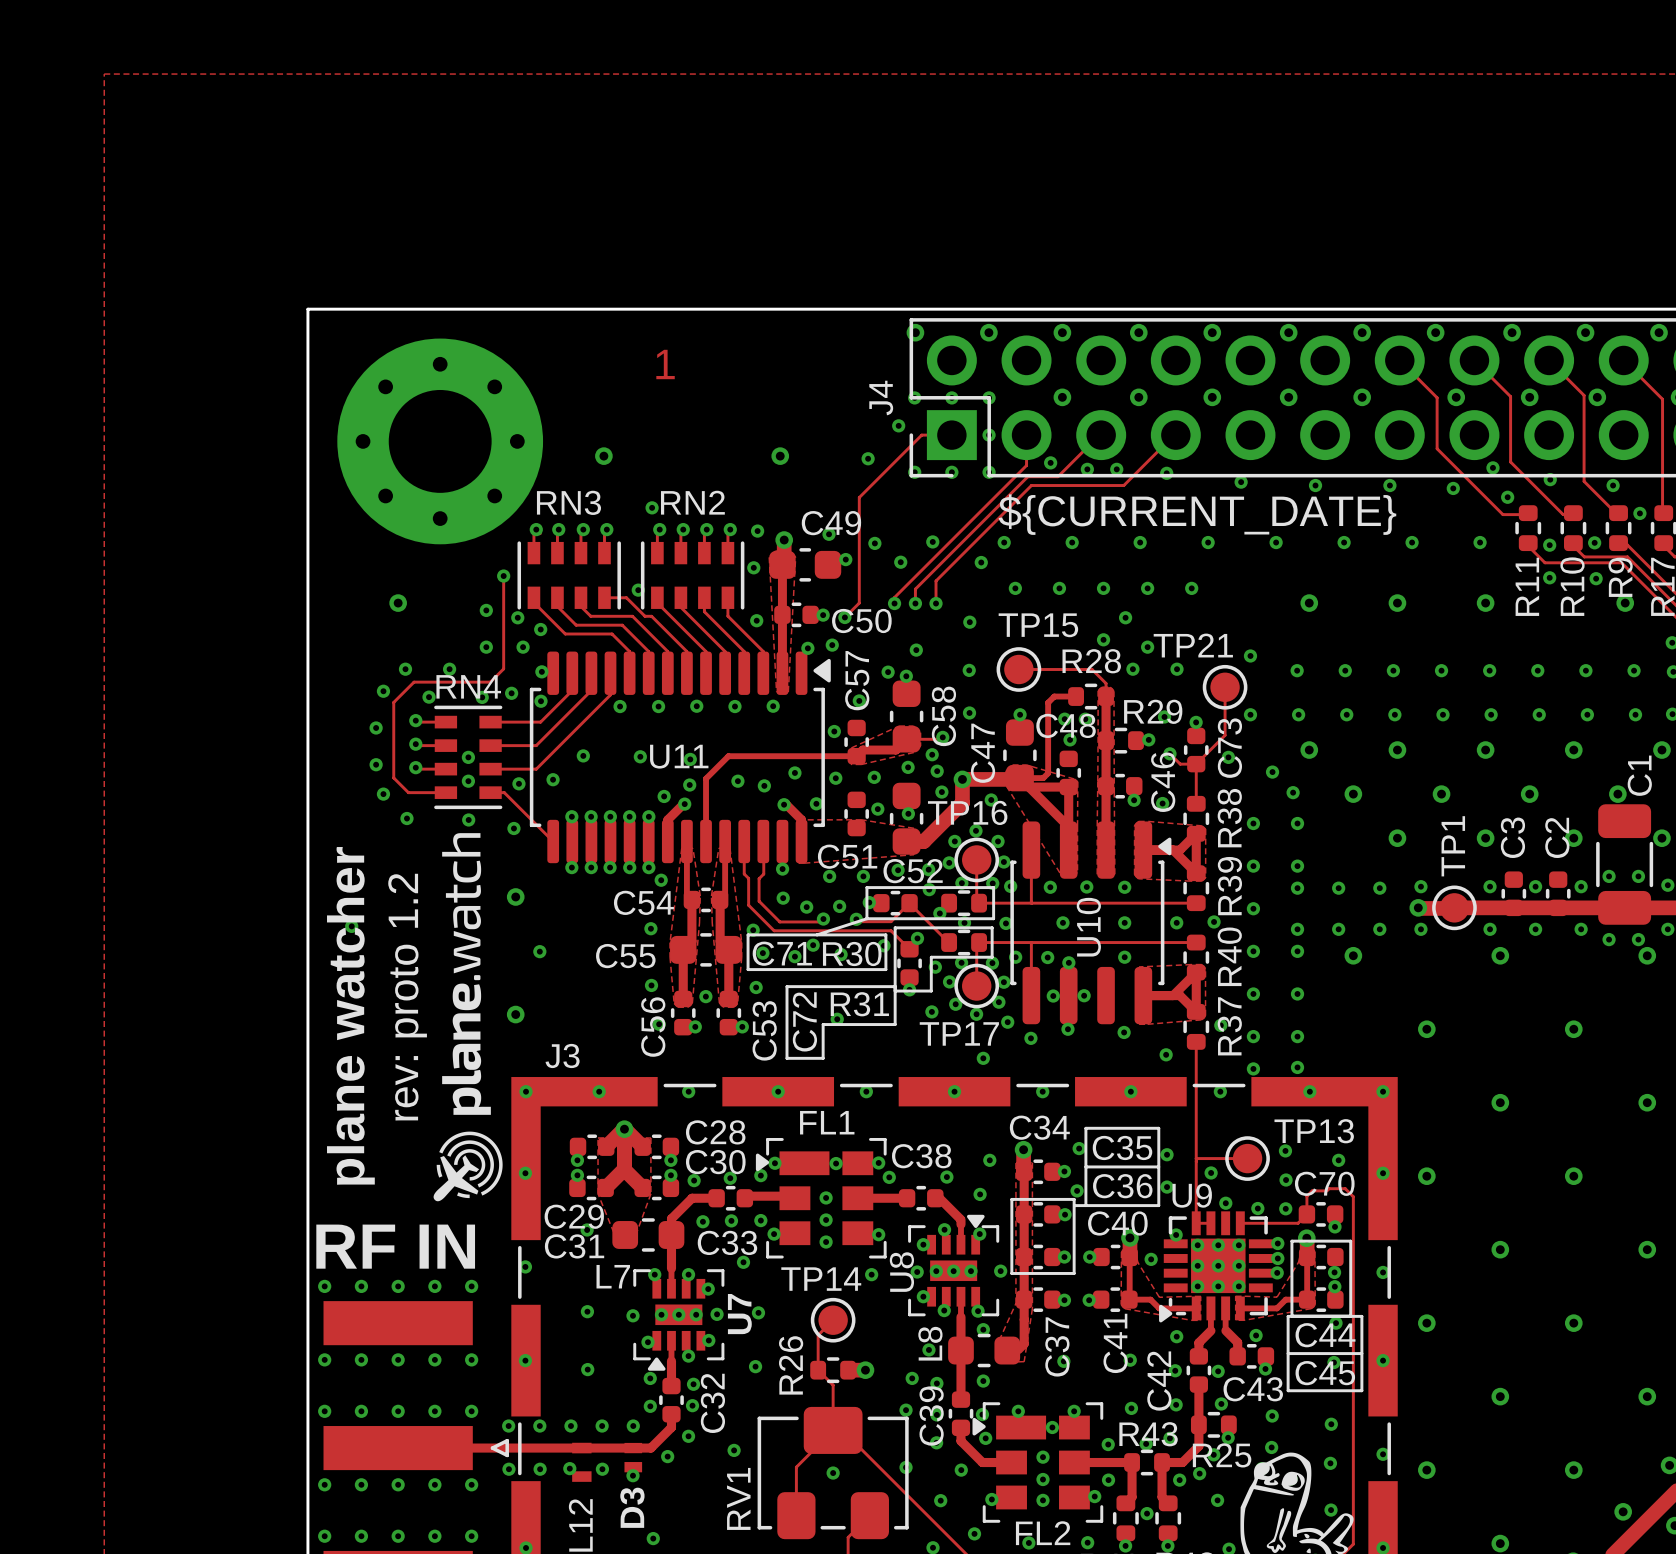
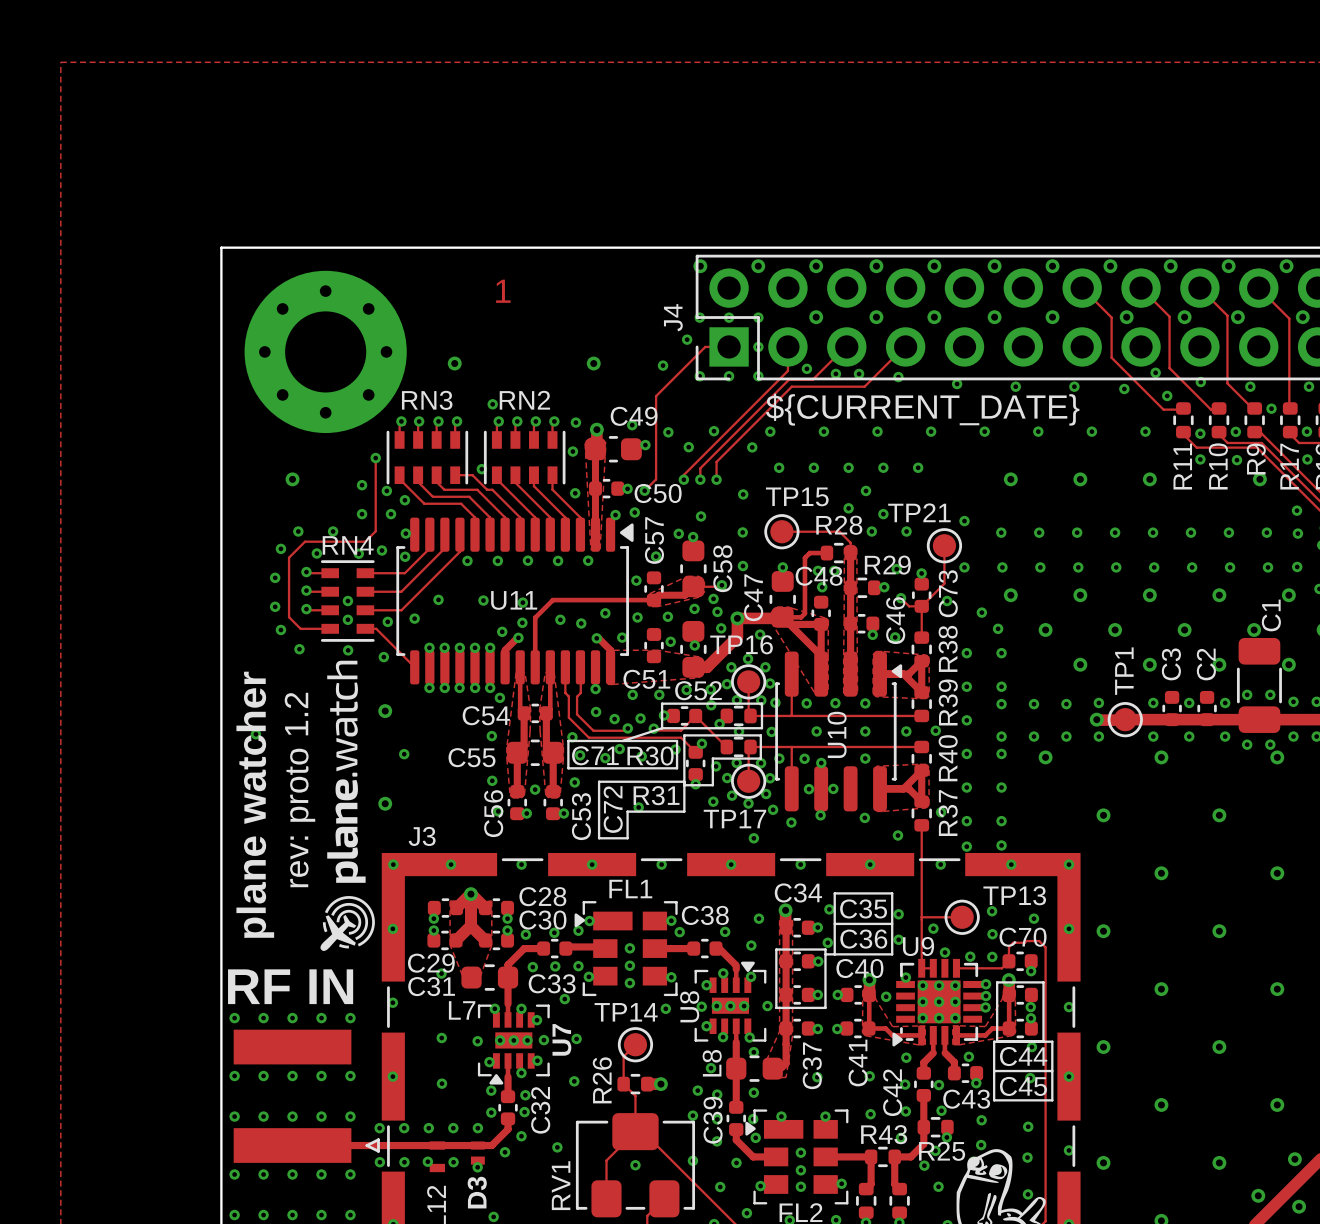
via: (836, 1163) -> none
via: (1052, 1427) -> none
via: (1146, 1443) -> none
via: (1108, 1444) -> none
via: (1108, 1480) -> none
via: (1179, 1480) -> none
via: (1147, 1513) -> none

